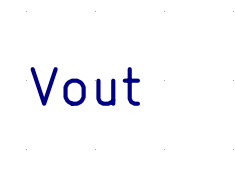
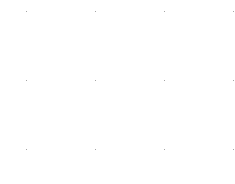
text: Vout (85, 86) -> none

